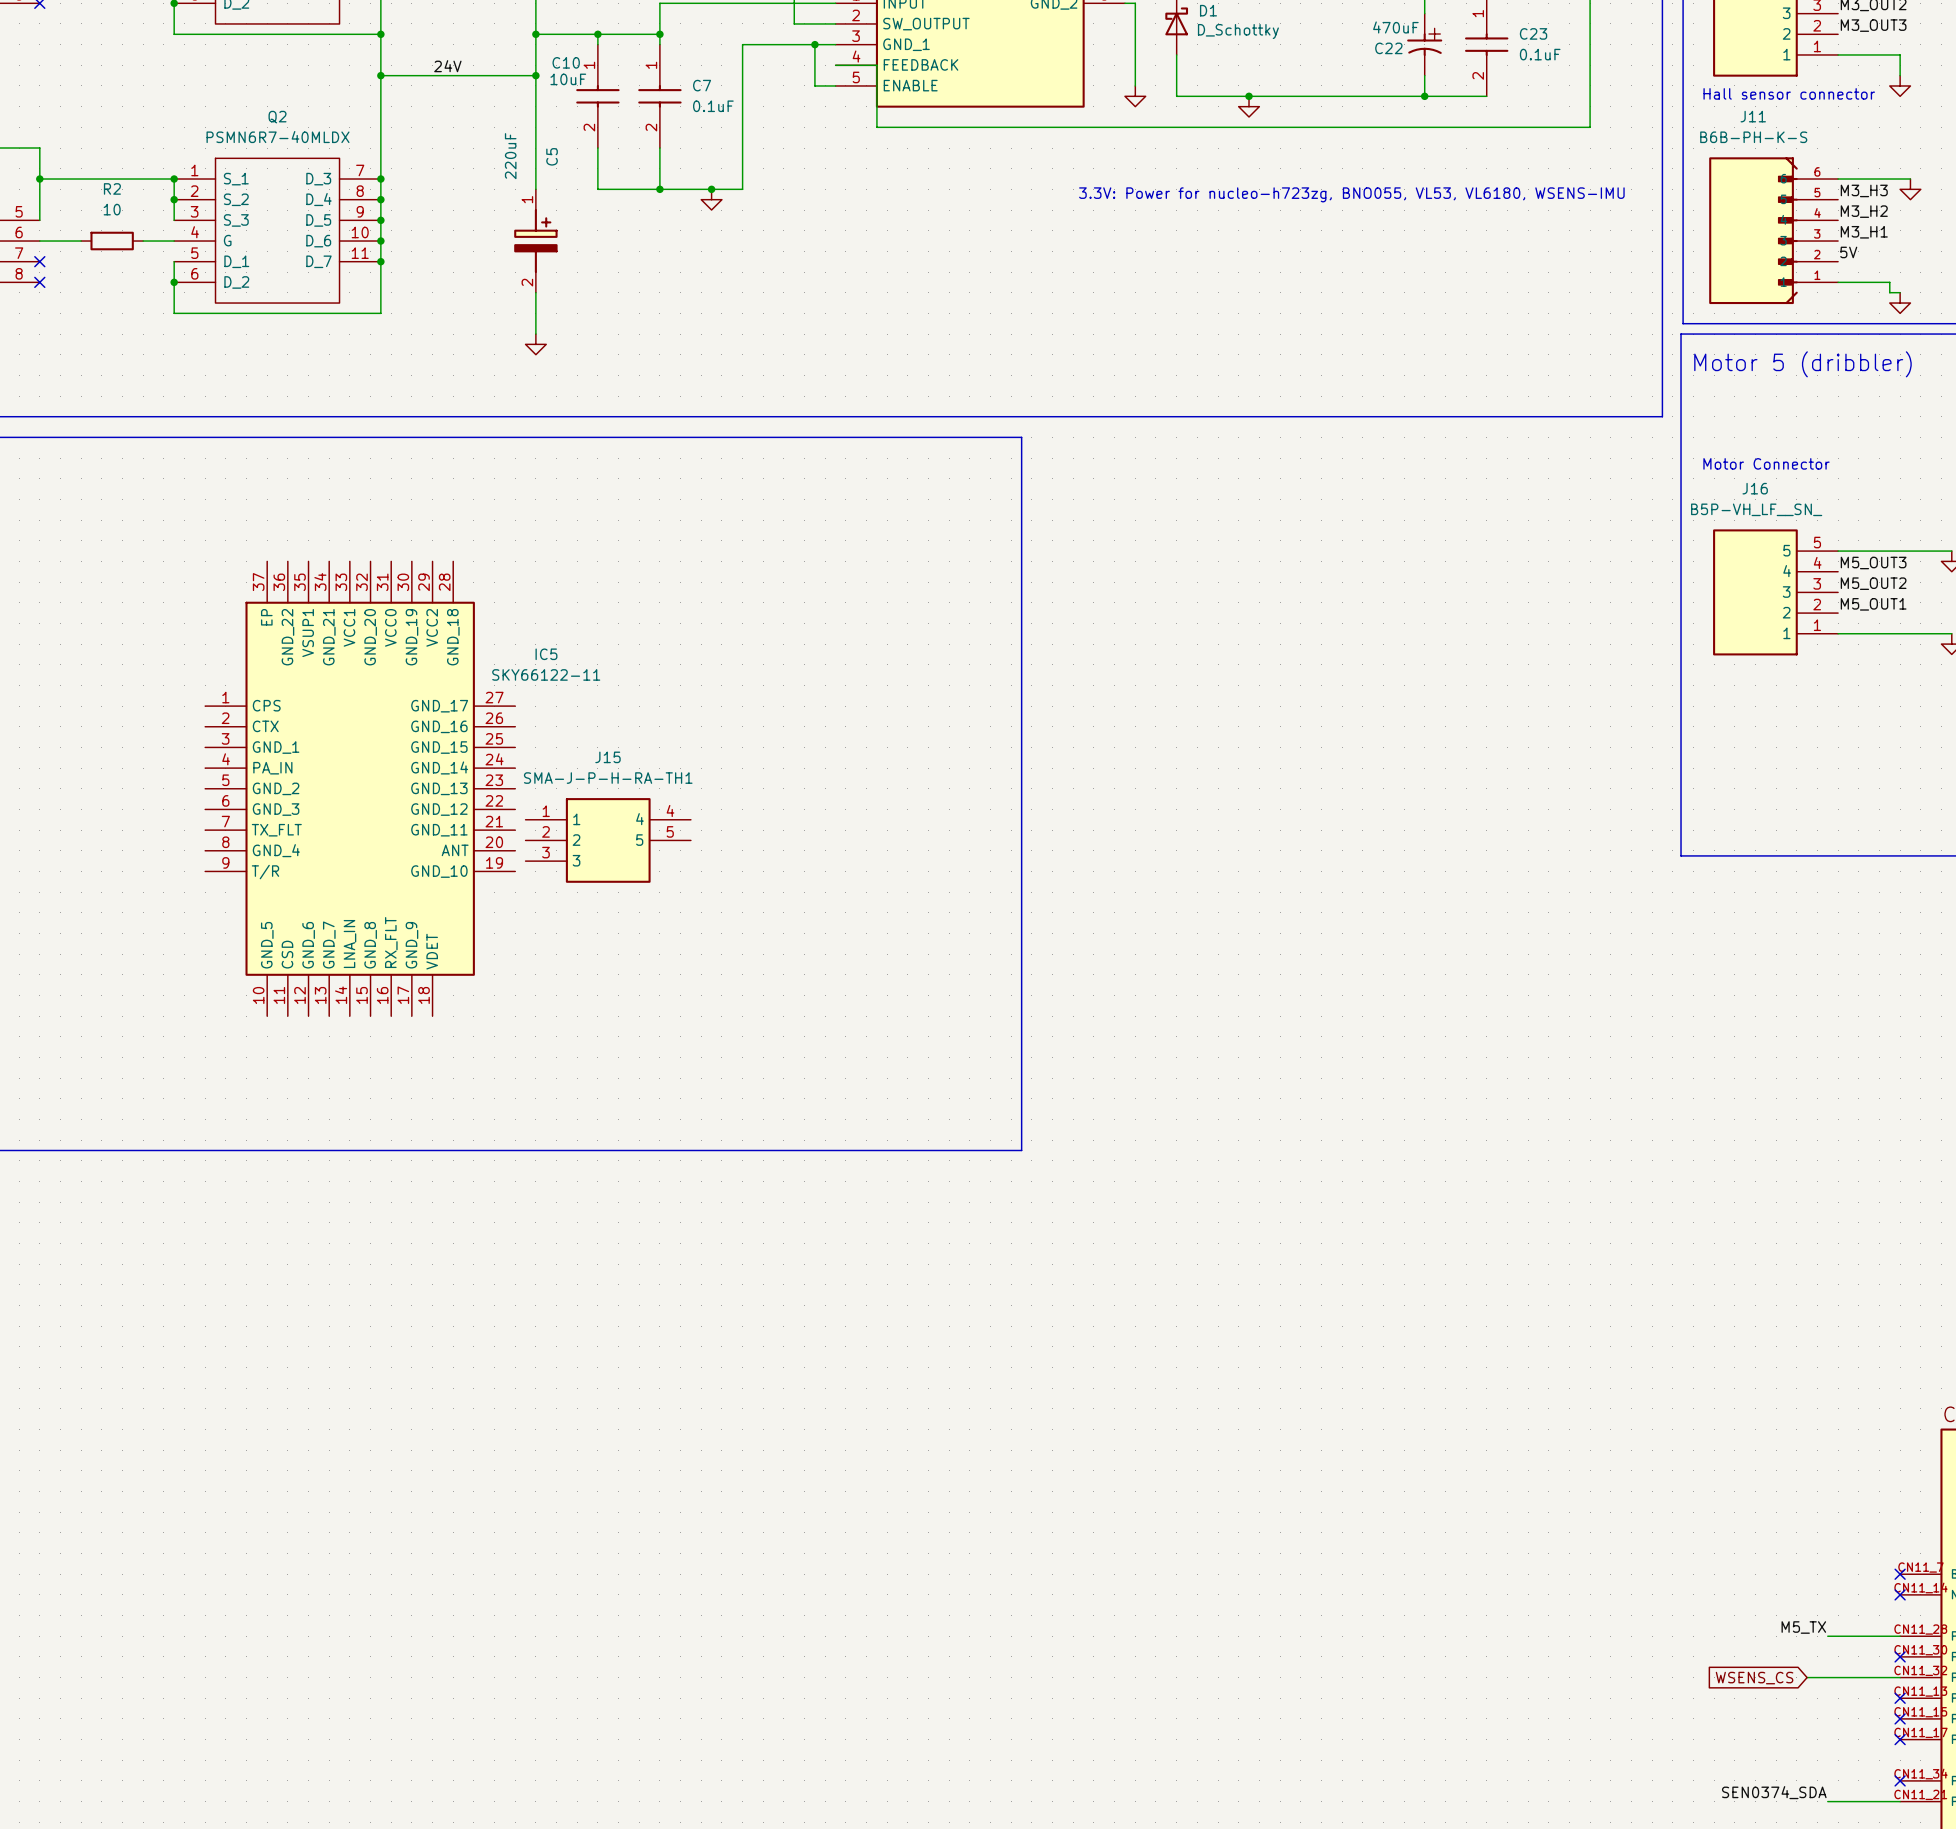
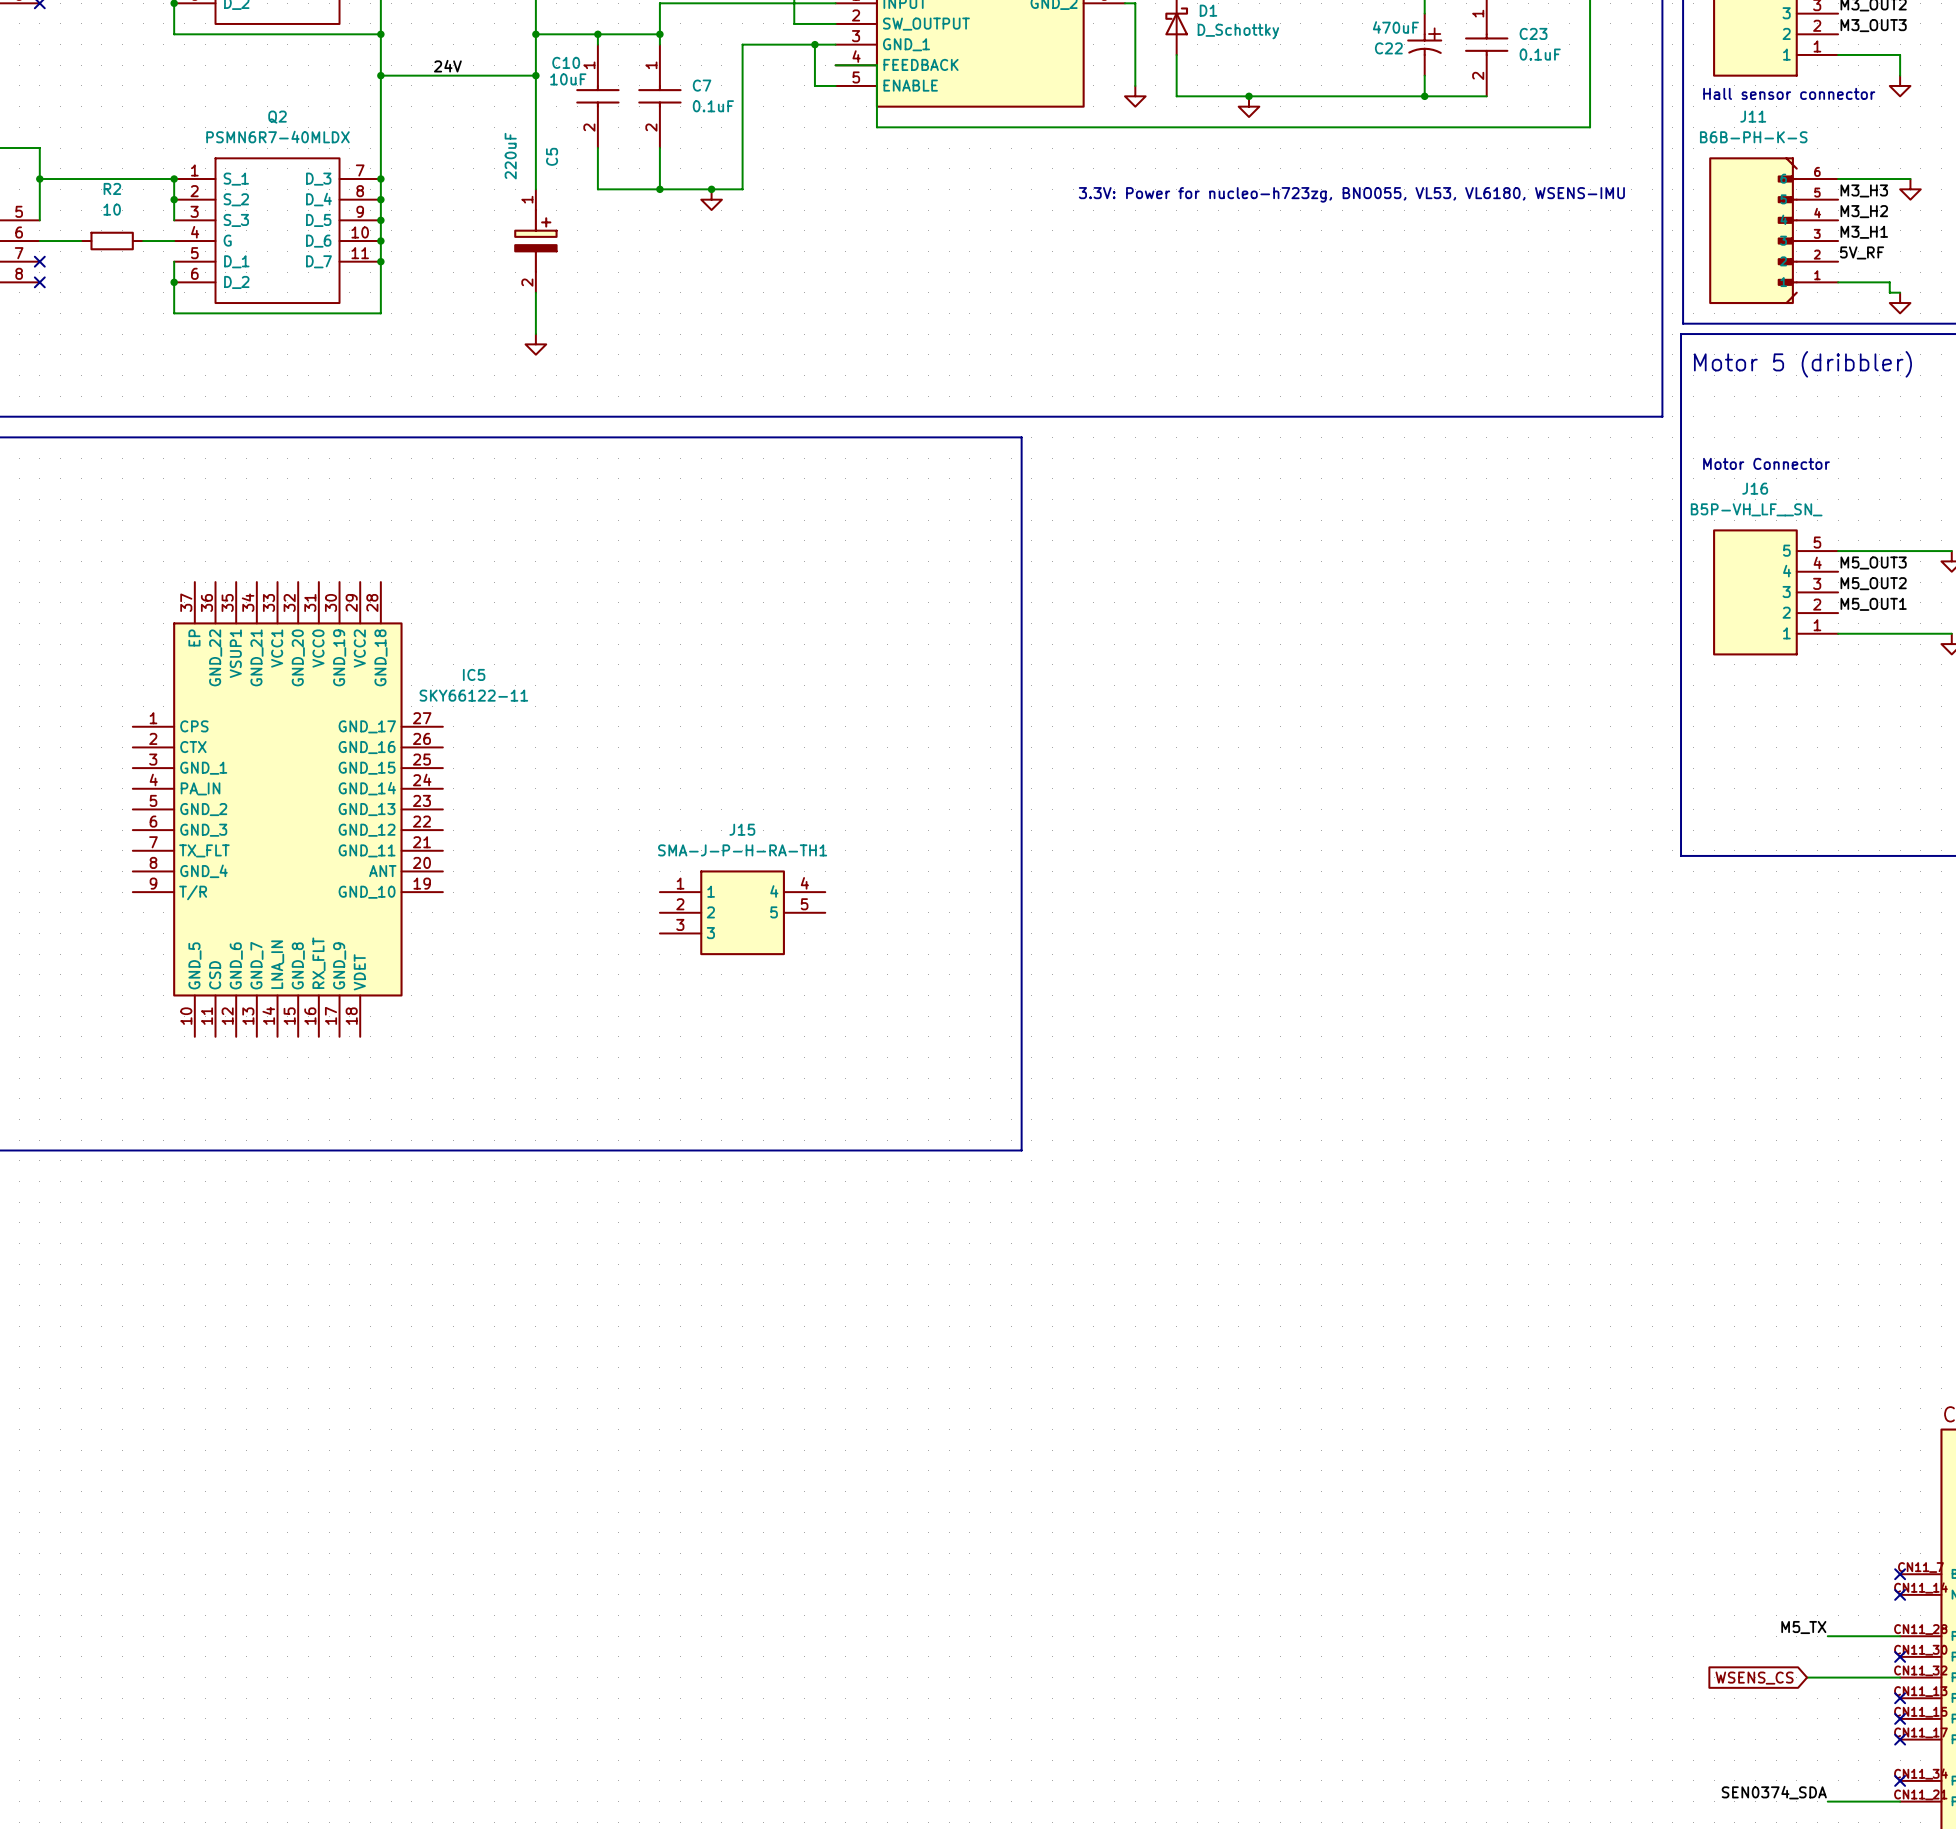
label: 5V (1848, 252) -> 5V_RF (1862, 252)
IC5 position: (360, 788) -> (287, 809)
J15 position: (608, 840) -> (742, 912)

